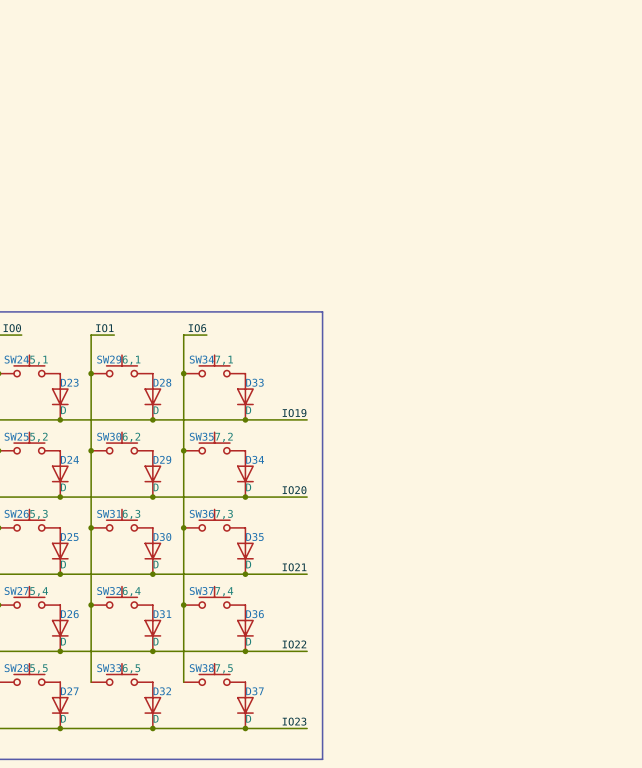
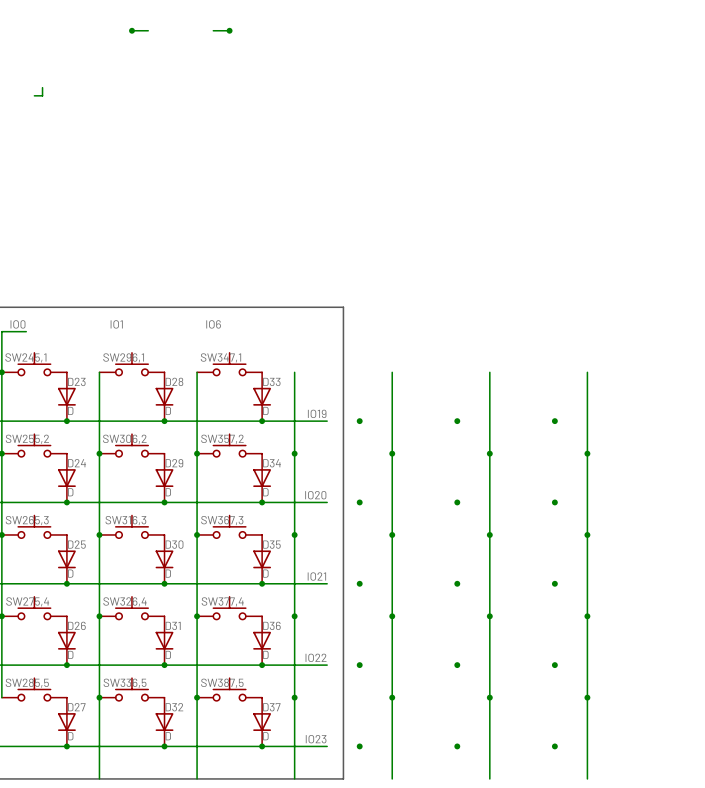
wire: none -> (131, 30) (148, 30)
junction: none -> (131, 30)
wire: none -> (213, 30) (229, 30)
junction: none -> (229, 30)
wire: none -> (42, 87) (42, 95) (34, 95)
wire: (114, 335) (91, 335) (91, 373) -> none
wire: (206, 335) (183, 335) (183, 373) -> none
junction: (91, 373) -> none
junction: (183, 373) -> none
wire: none -> (294, 372) (294, 778)
wire: none -> (392, 372) (392, 778)
wire: none -> (489, 372) (489, 778)
wire: none -> (587, 372) (587, 778)
junction: none -> (359, 421)
junction: none -> (457, 421)
junction: none -> (554, 421)
junction: none -> (294, 453)
junction: none -> (392, 453)
junction: none -> (489, 453)
junction: none -> (587, 453)
junction: none -> (359, 502)
junction: none -> (457, 502)
junction: none -> (554, 502)
junction: none -> (294, 534)
junction: none -> (392, 534)
junction: none -> (489, 534)
junction: none -> (587, 534)
junction: none -> (359, 583)
junction: none -> (457, 583)
junction: none -> (554, 583)
junction: none -> (294, 616)
junction: none -> (392, 616)
junction: none -> (489, 616)
junction: none -> (587, 616)
junction: none -> (359, 665)
junction: none -> (457, 665)
junction: none -> (554, 665)
wire: none -> (99, 697) (99, 778)
junction: none -> (99, 697)
wire: none -> (197, 697) (197, 778)
junction: none -> (197, 697)
junction: none -> (294, 697)
junction: none -> (392, 697)
junction: none -> (489, 697)
junction: none -> (587, 697)
junction: none -> (359, 746)
junction: none -> (457, 746)
junction: none -> (554, 746)

